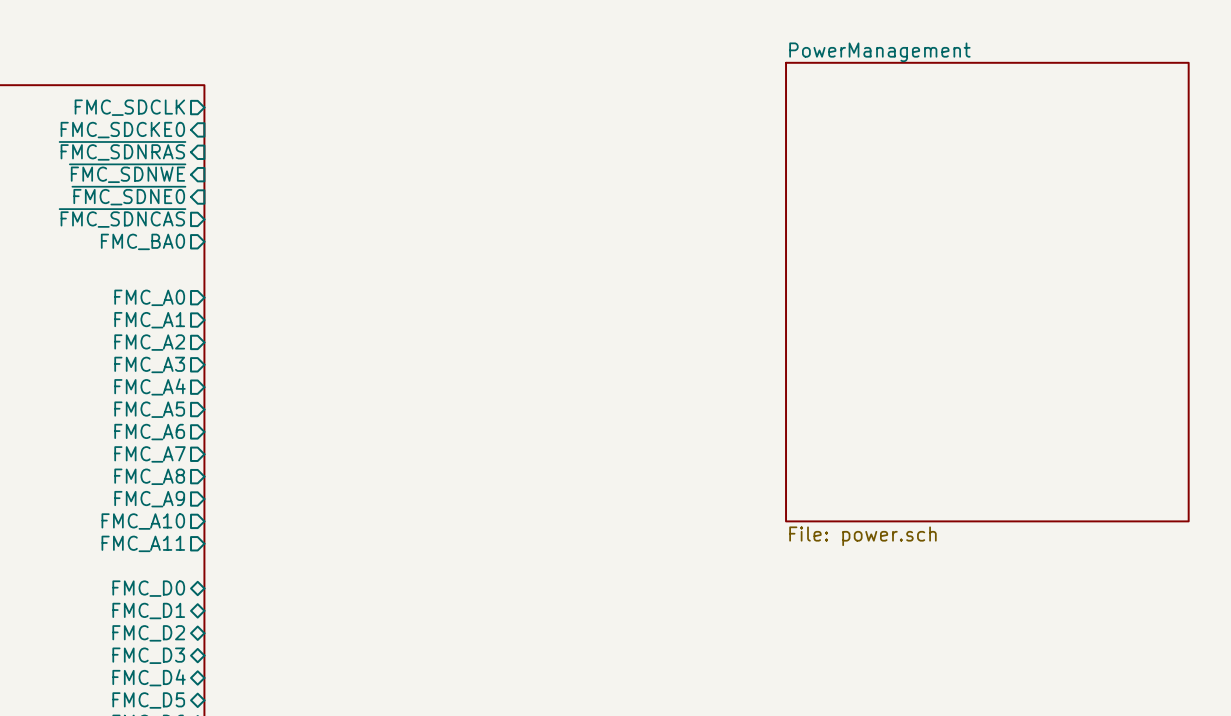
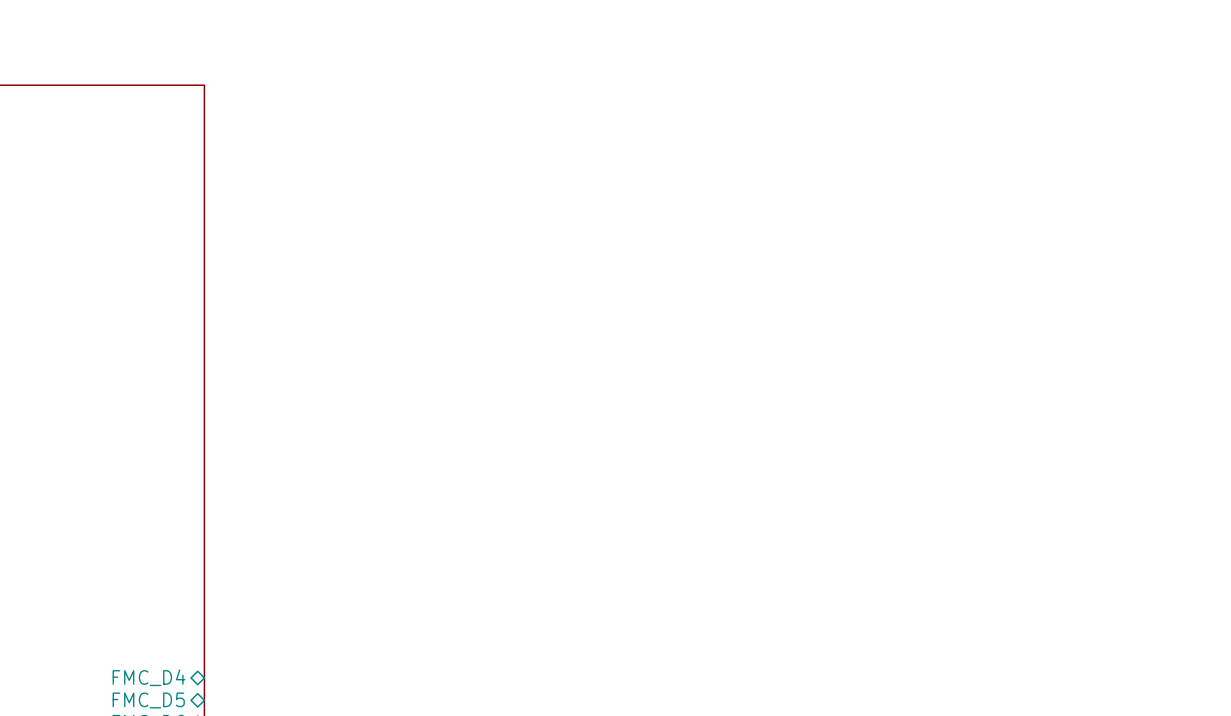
sheet pin: FMC_SDCLK (129, 107) -> none
sheet pin: FMC_SDCKE0 (122, 130) -> none
sheet pin: ~{FMC_SDNRAS} (122, 150) -> none
sheet pin: ~{FMC_SDNWE} (127, 173) -> none
sheet pin: ~{FMC_SDNE0} (128, 195) -> none
sheet pin: ~{FMC_SDNCAS} (122, 217) -> none
sheet pin: FMC_BA0 (142, 241) -> none
sheet PowerManagement: File: power.sch (987, 292) -> none
sheet pin: FMC_A0 (149, 297) -> none
sheet pin: FMC_A1 (149, 320) -> none
sheet pin: FMC_A2 (149, 342) -> none
sheet pin: FMC_A3 (149, 364) -> none
sheet pin: FMC_A4 (150, 386) -> none
sheet pin: FMC_A5 (149, 409) -> none
sheet pin: FMC_A6 (149, 432) -> none
sheet pin: FMC_A7 (150, 454) -> none
sheet pin: FMC_A8 (149, 476) -> none
sheet pin: FMC_A9 (149, 499) -> none
sheet pin: FMC_A10 (143, 521) -> none
sheet pin: FMC_A11 (143, 543) -> none
sheet pin: FMC_D0 (148, 588) -> none
sheet pin: FMC_D1 (148, 611) -> none
sheet pin: FMC_D2 (148, 633) -> none
sheet pin: FMC_D3 (148, 655) -> none

